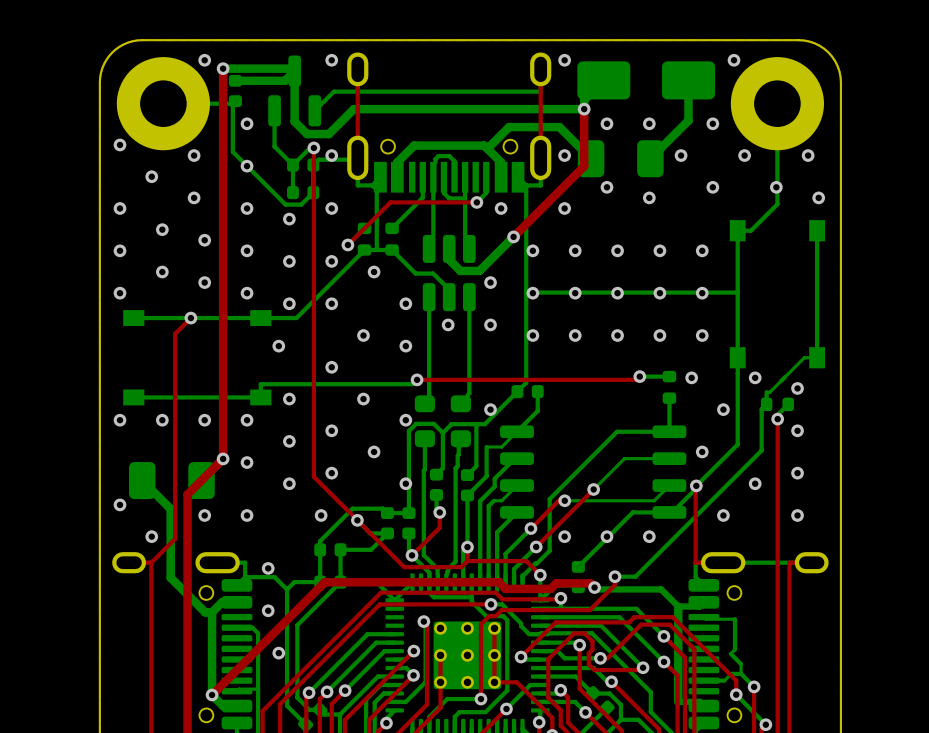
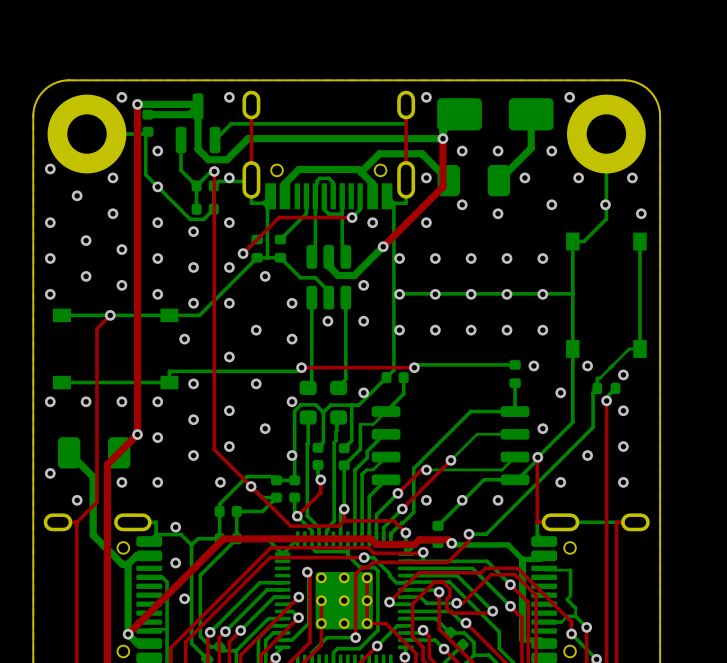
top track: (639, 376) (636, 379) (550, 379) -> none
bottom track: none -> (489, 364) (417, 364) (414, 367)
via position: (639, 376) -> (414, 367)

